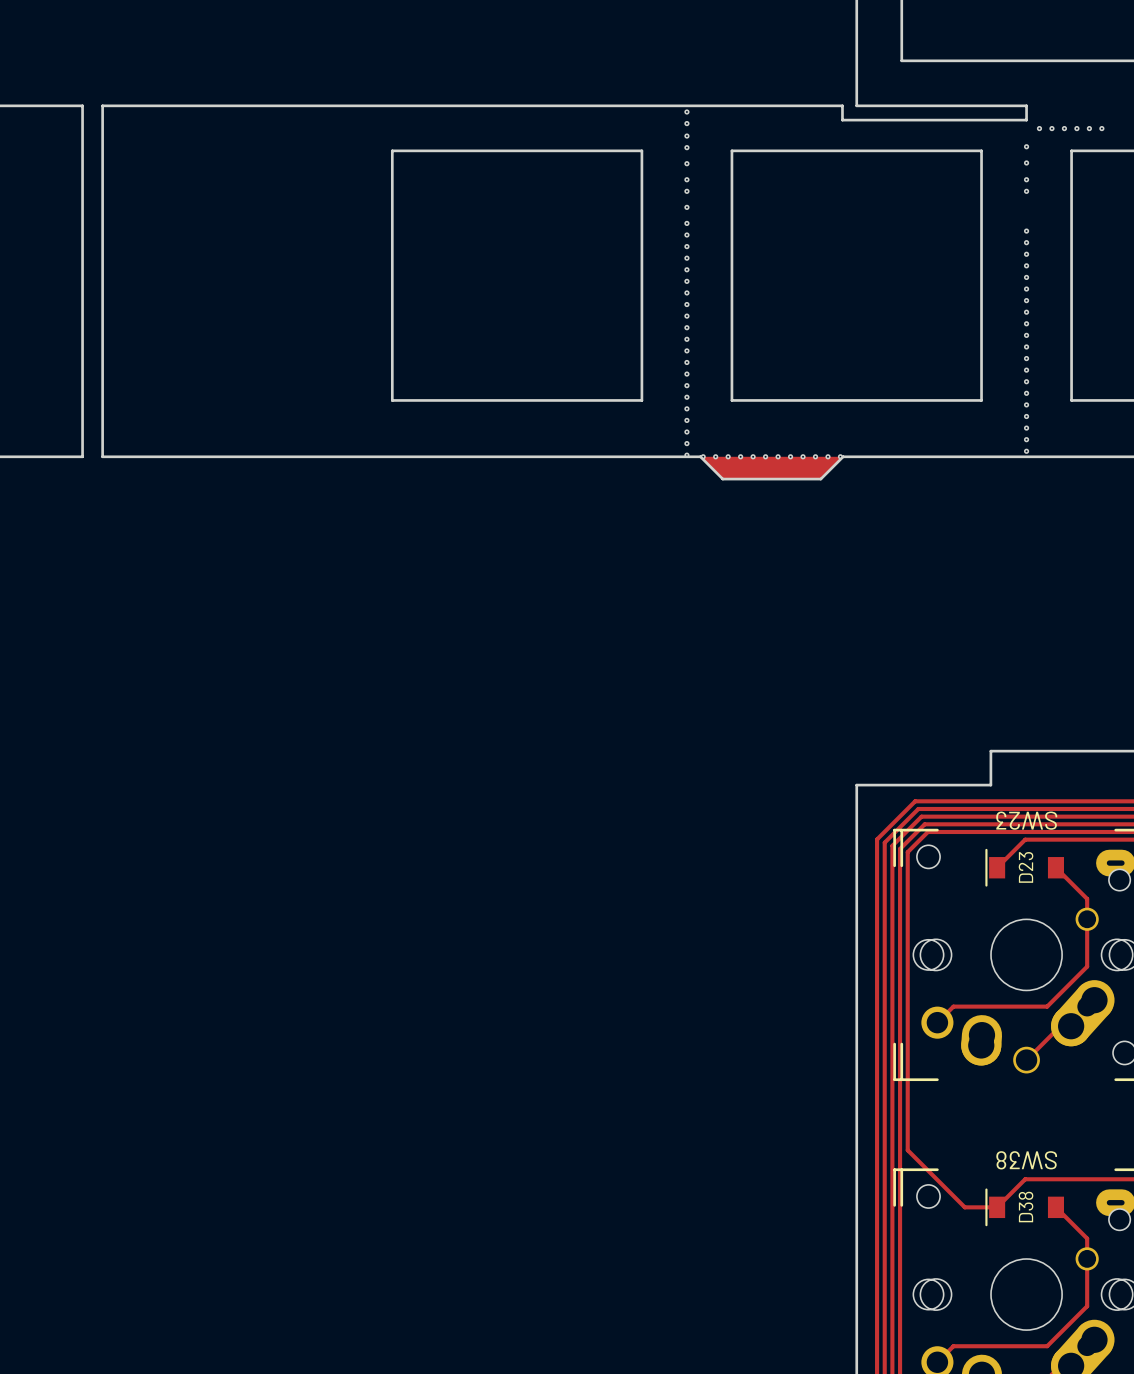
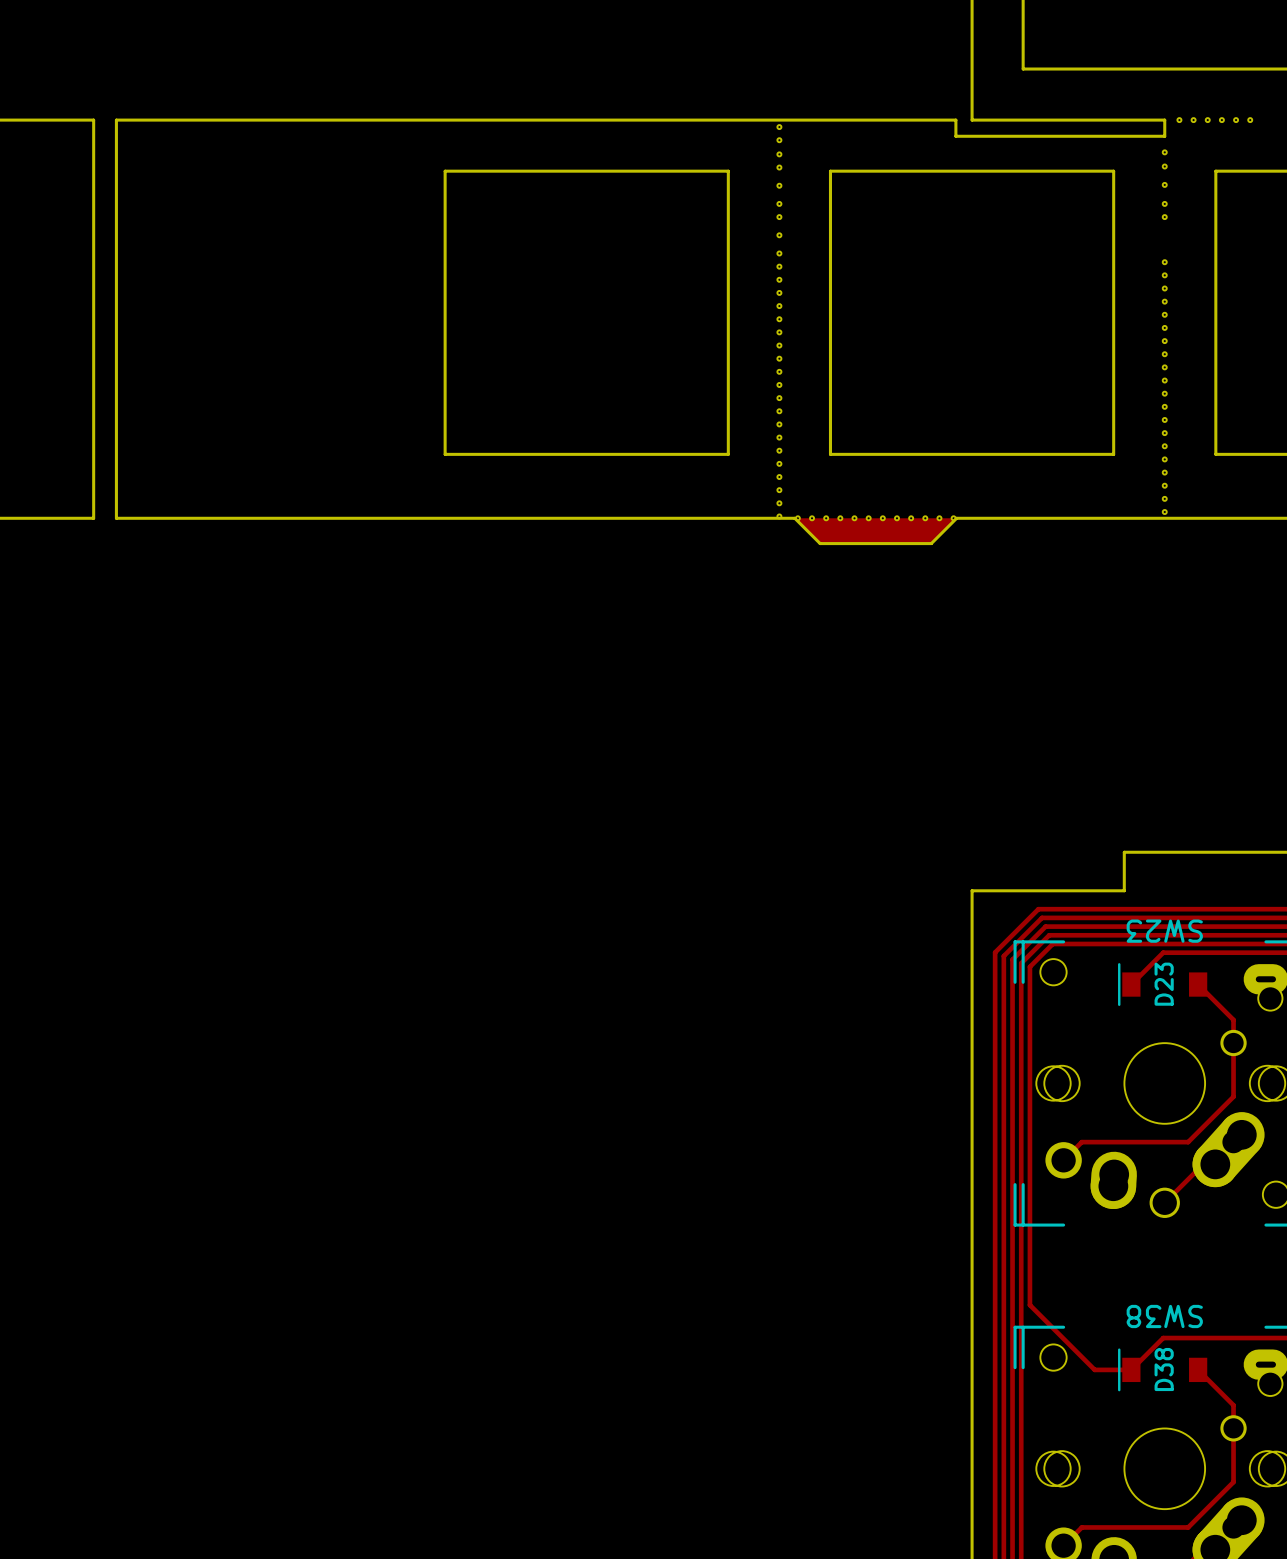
part: none -> (1179, 120)
part: none -> (1193, 120)
part: none -> (1207, 120)
part: none -> (1221, 120)
part: none -> (1236, 120)
part: none -> (1250, 120)
part: (1039, 128) -> none
part: (1051, 128) -> none
part: (1064, 128) -> none
part: (1076, 128) -> none
part: (1089, 128) -> none
part: (1101, 128) -> none
part: none -> (1164, 152)

